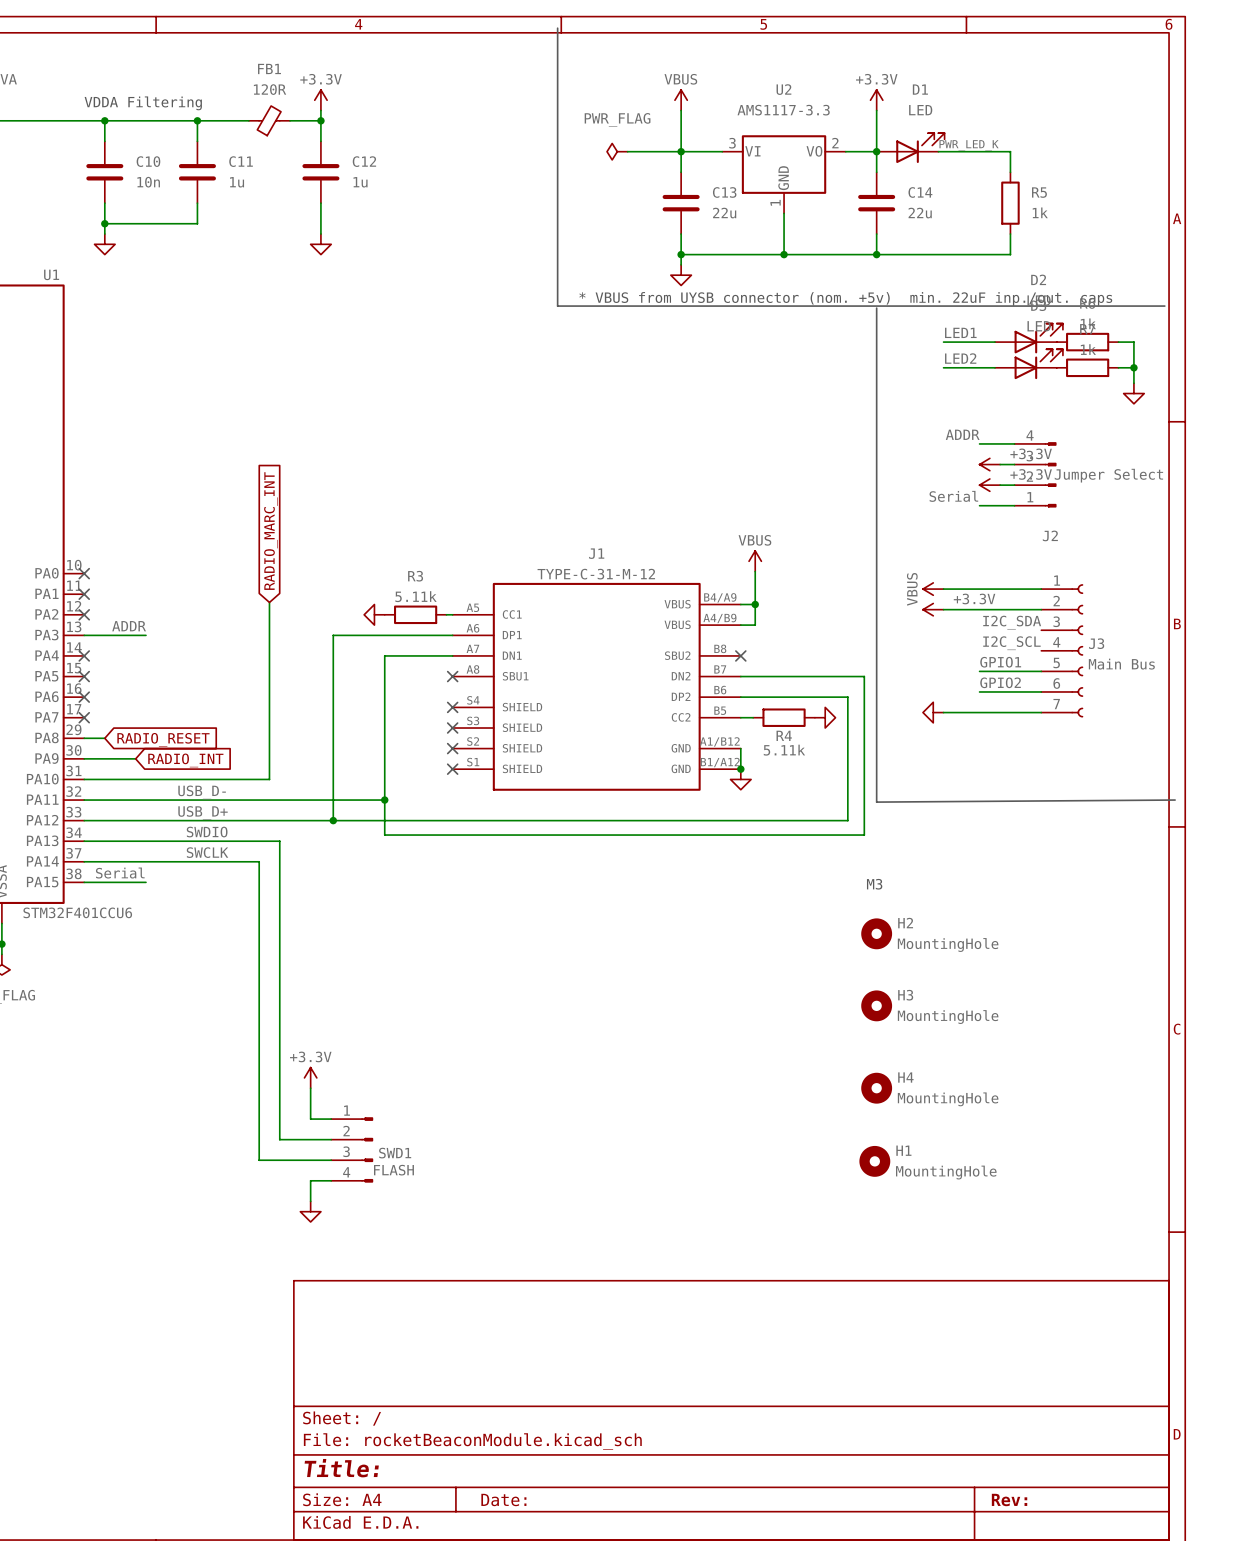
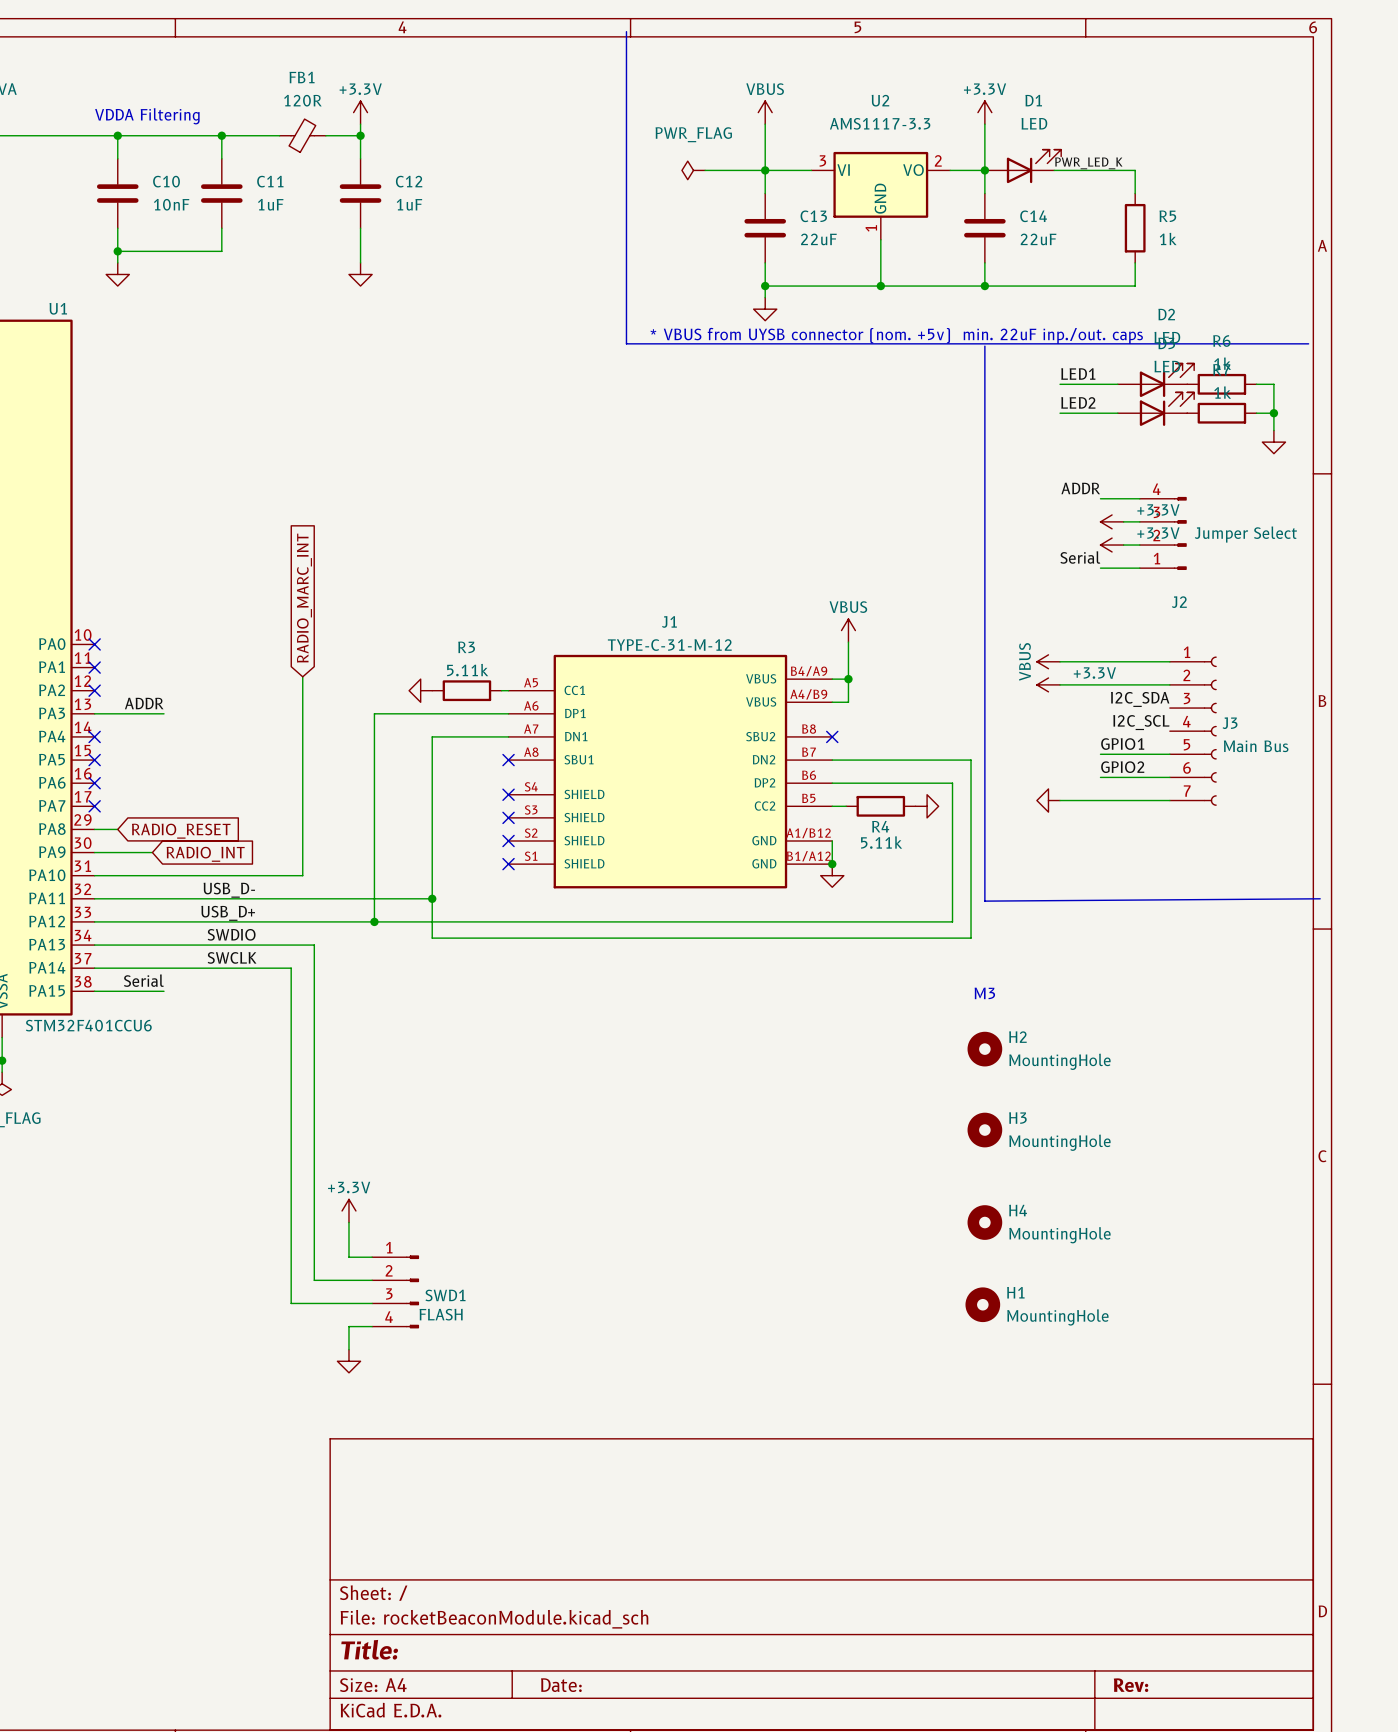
C10 value: 10n (148, 182) -> 10nF (171, 204)
C11 value: 1u (237, 182) -> 1uF (270, 204)
C12 value: 1u (360, 182) -> 1uF (409, 204)
C13 value: 22u (724, 213) -> 22uF (818, 239)
C14 value: 22u (920, 213) -> 22uF (1038, 239)

